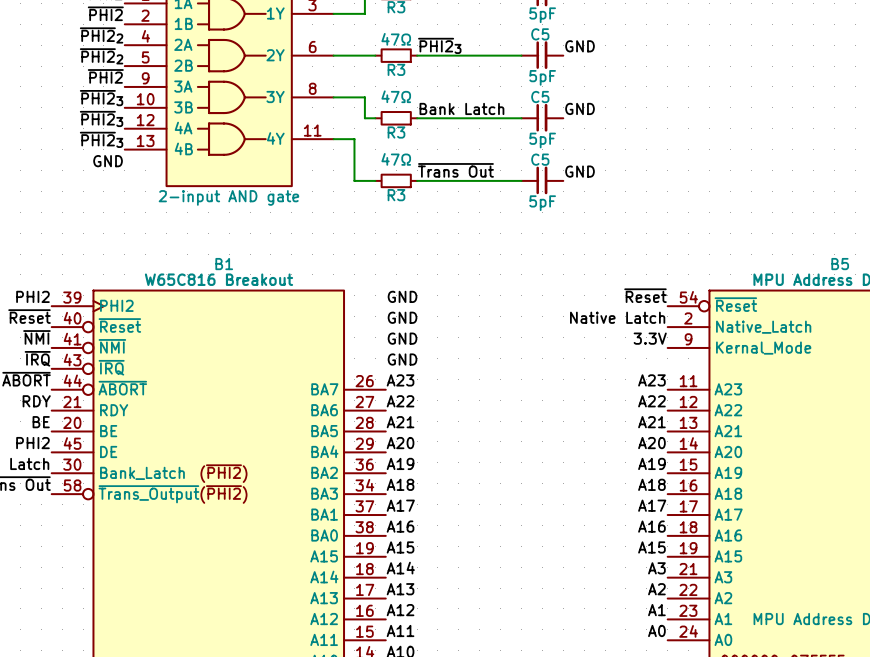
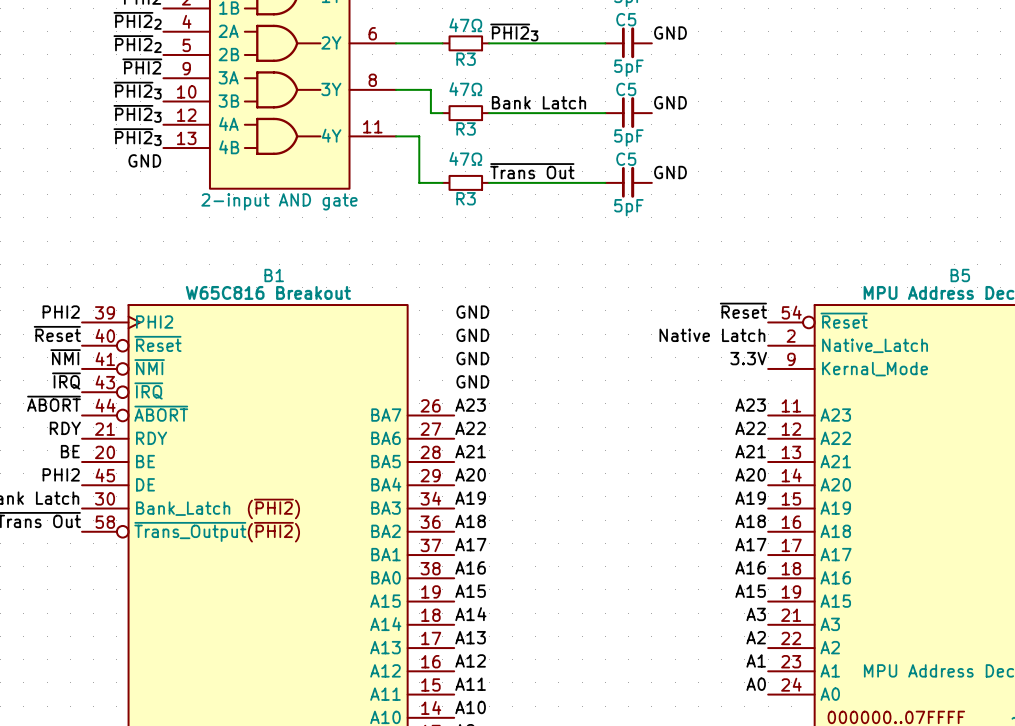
B1 pin number: 36 (364, 464) -> 34 (430, 498)
B1 pin name: BA2 (324, 472) -> BA3 (386, 508)
B1 pin number: 34 (364, 485) -> 36 (430, 522)
B1 pin name: BA3 (324, 493) -> BA2 (386, 531)

